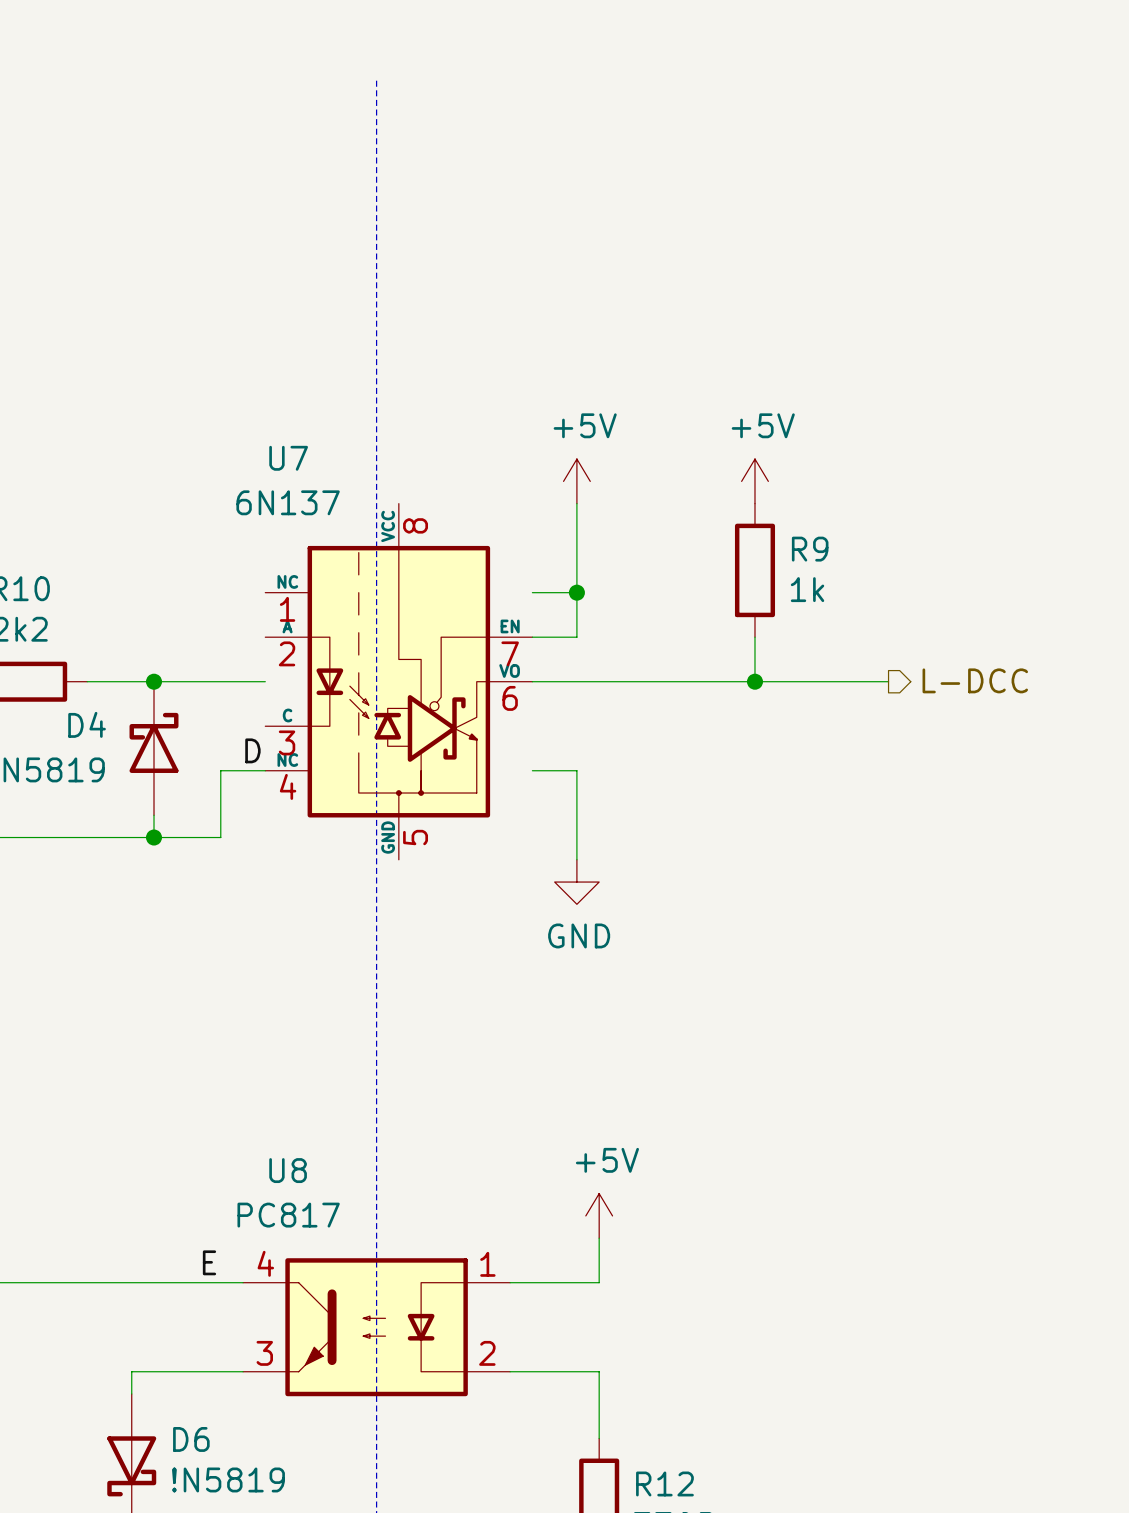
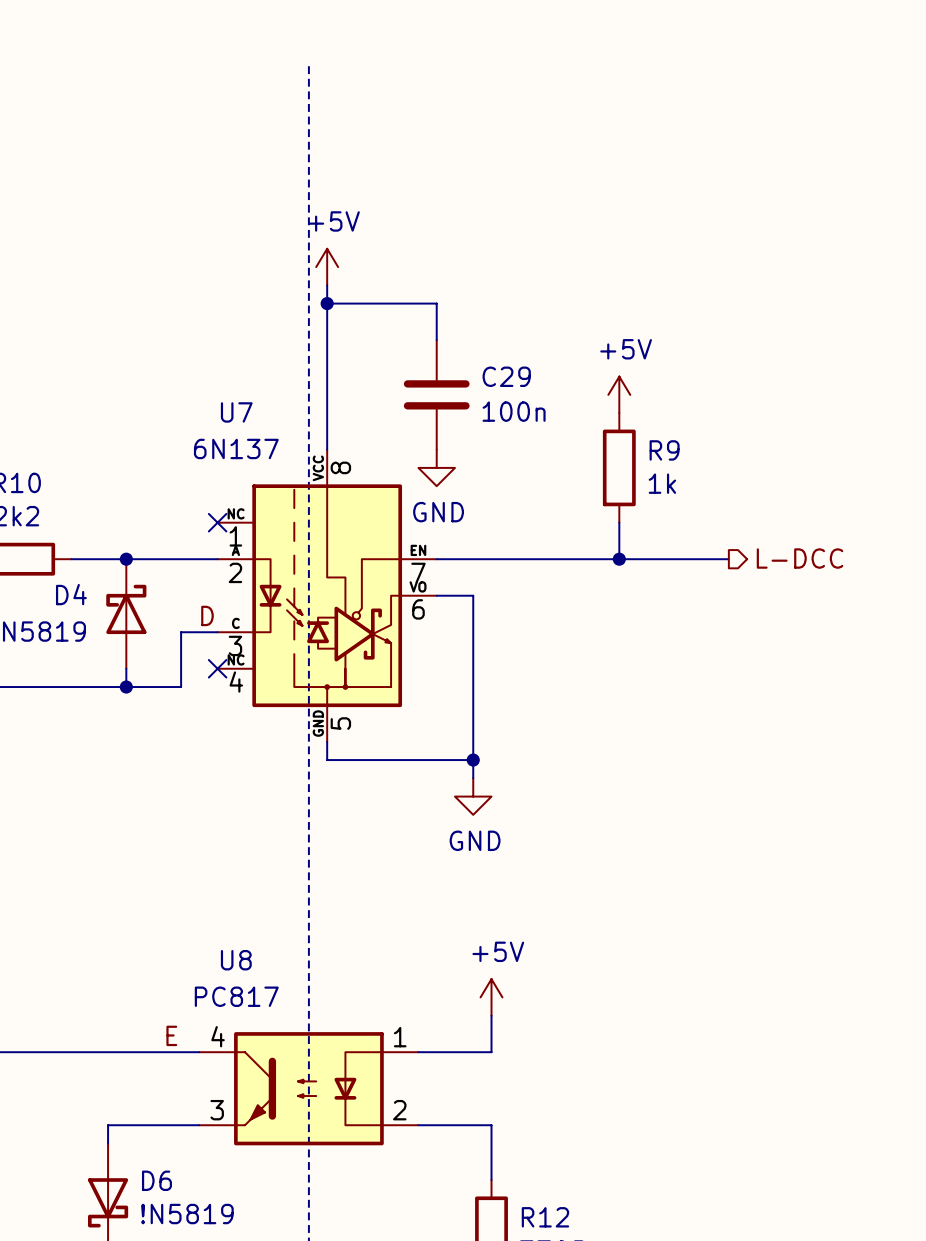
wire: none -> (327, 285) (327, 449)
wire: none -> (327, 303) (436, 303) (436, 340)
junction: none -> (327, 303)
C29: none -> 100n (436, 394)
power symbol position: +5V (576, 481) -> +5V (327, 267)
wire: (576, 503) (576, 637) (532, 637) -> none
power symbol: none -> GND (436, 467)
wire: (532, 592) (576, 592) -> none
junction: (576, 592) -> none
no-connect mark: none -> (217, 522)
U7 position: (398, 681) -> (327, 595)
wire: (532, 770) (576, 770) -> (436, 595) (473, 595) (473, 632)
no-connect mark: none -> (217, 668)
wire: none -> (473, 705) (473, 778)
power symbol position: GND (576, 882) -> GND (473, 796)
wire: none -> (327, 741) (327, 760) (473, 760)
junction: none -> (473, 760)

